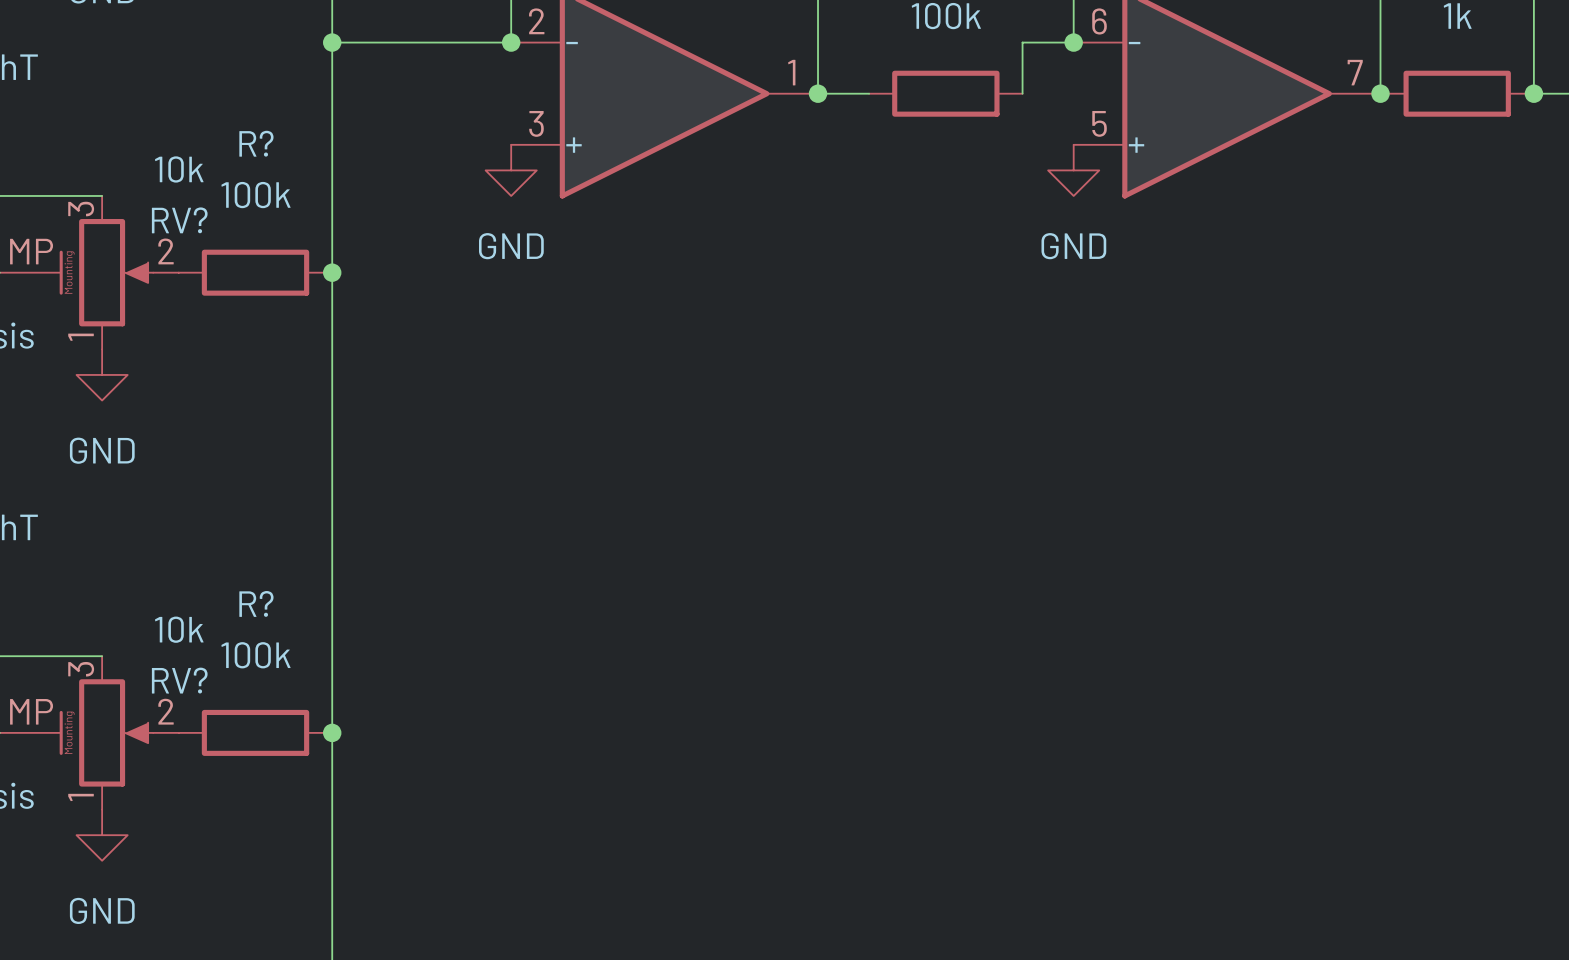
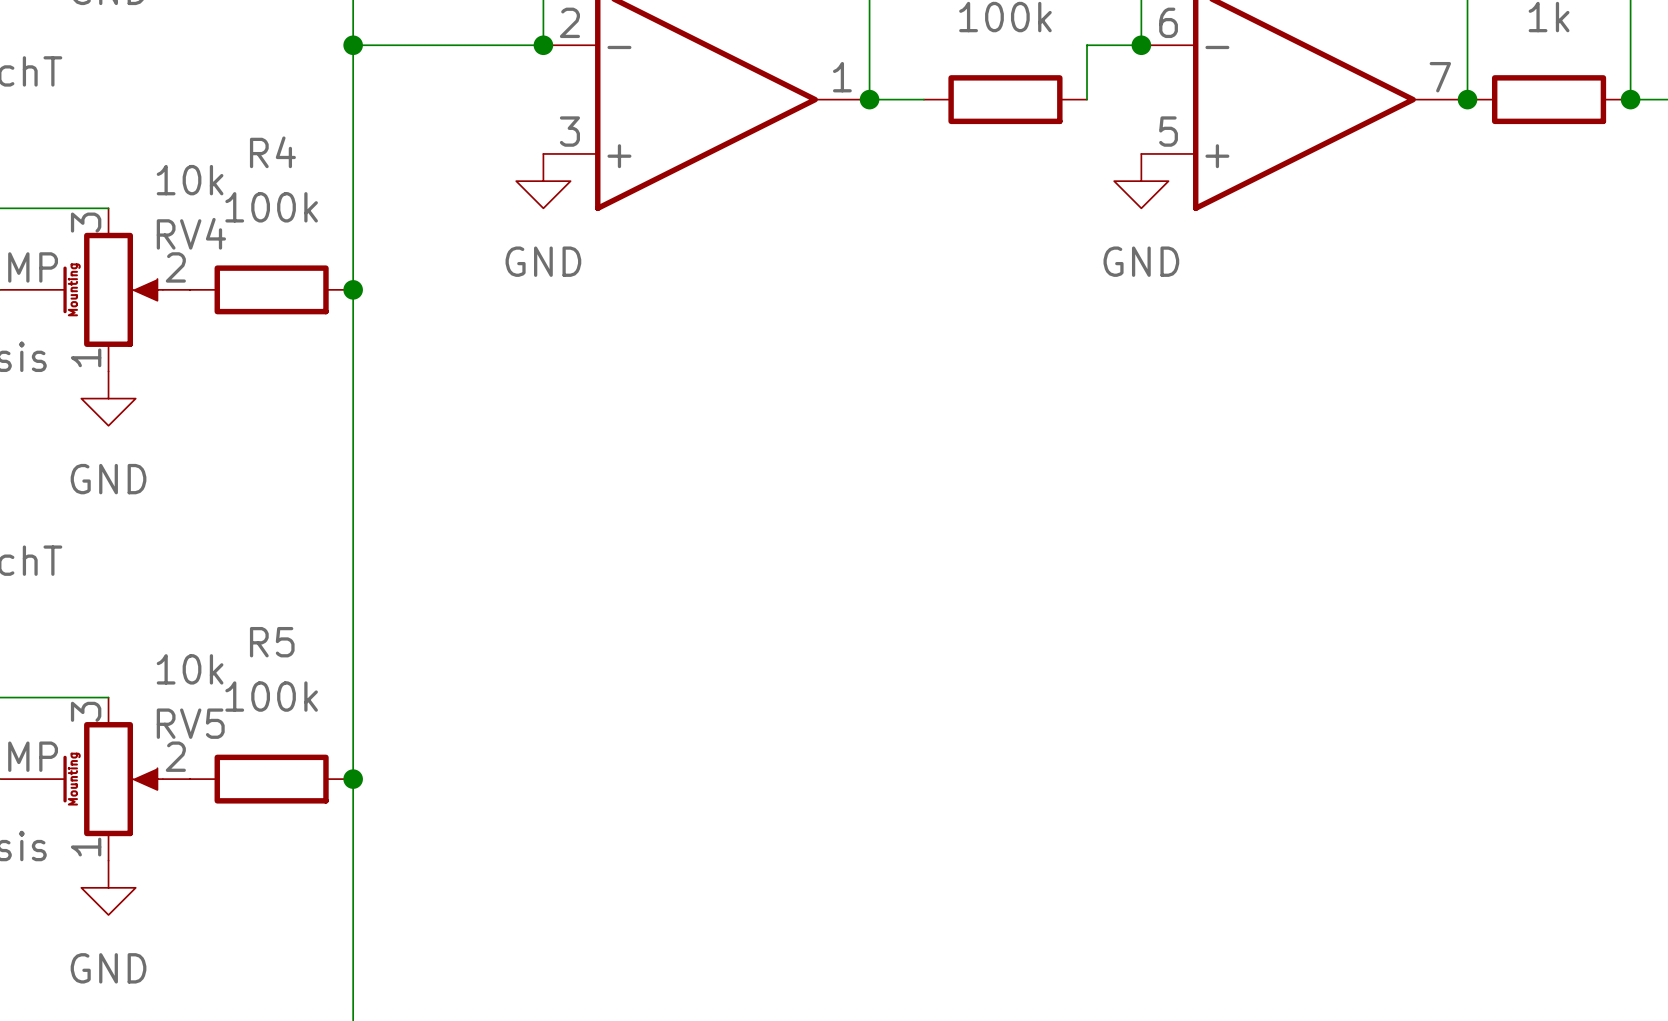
R? name: R? (256, 143) -> R4 (272, 152)
RV? name: RV? (179, 220) -> RV4 (191, 233)
R? name: R? (256, 603) -> R5 (272, 642)
RV? name: RV? (179, 680) -> RV5 (190, 723)

